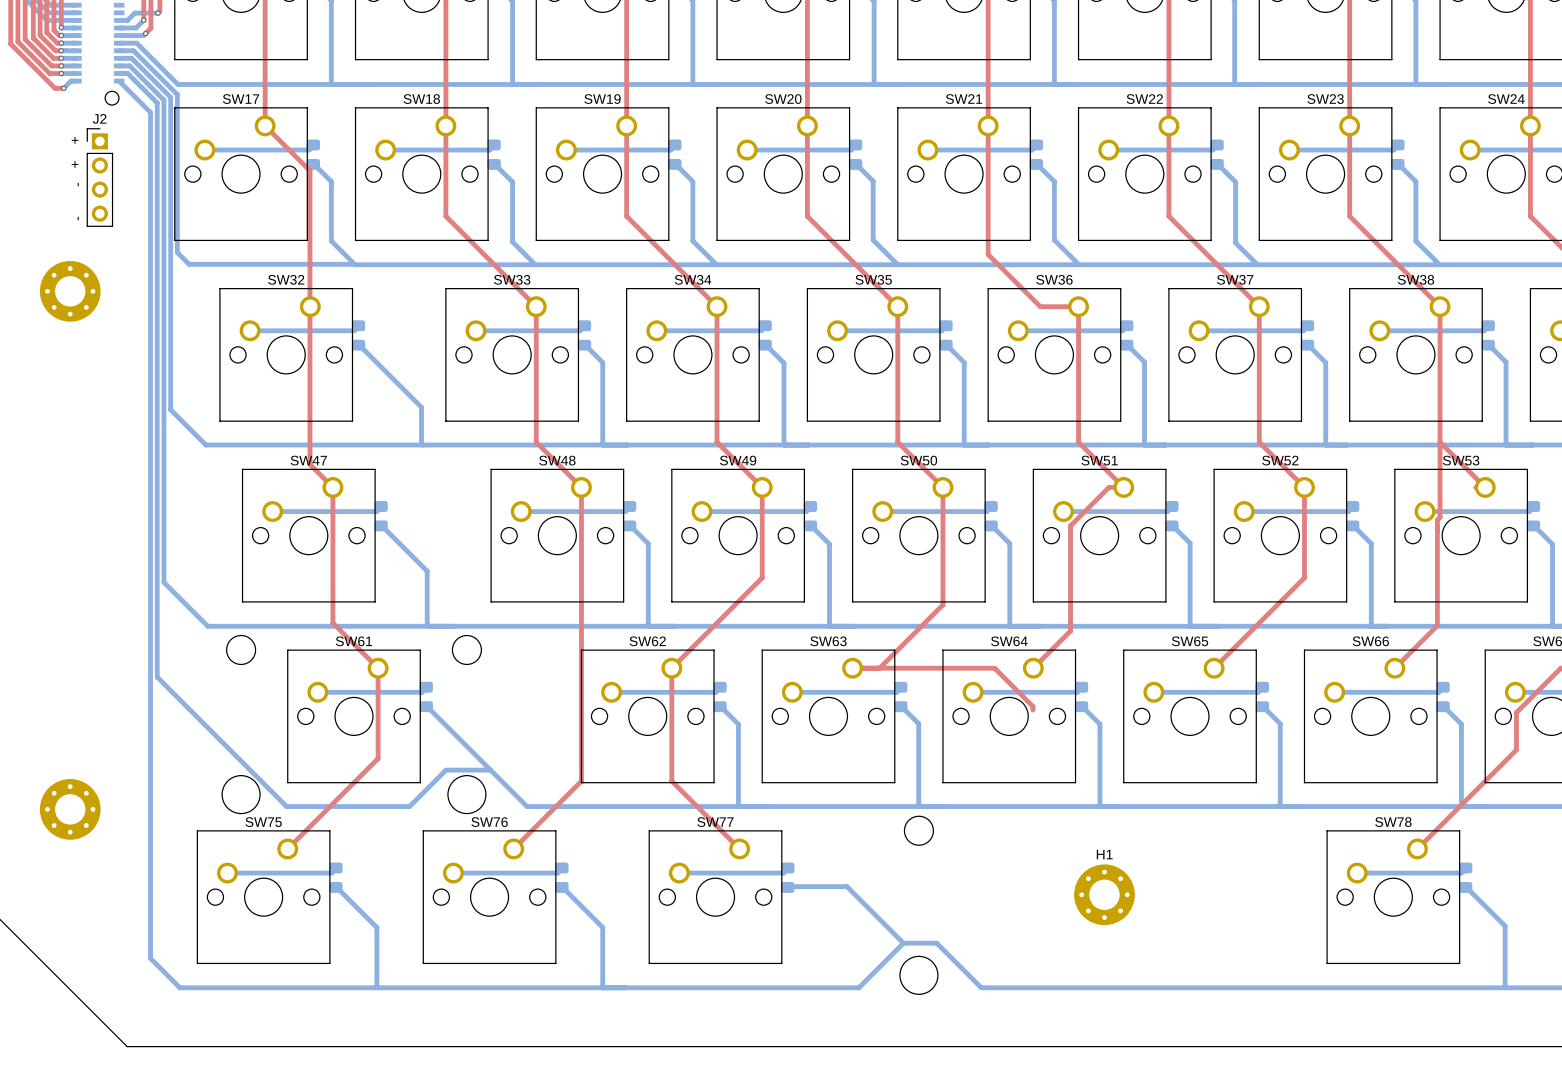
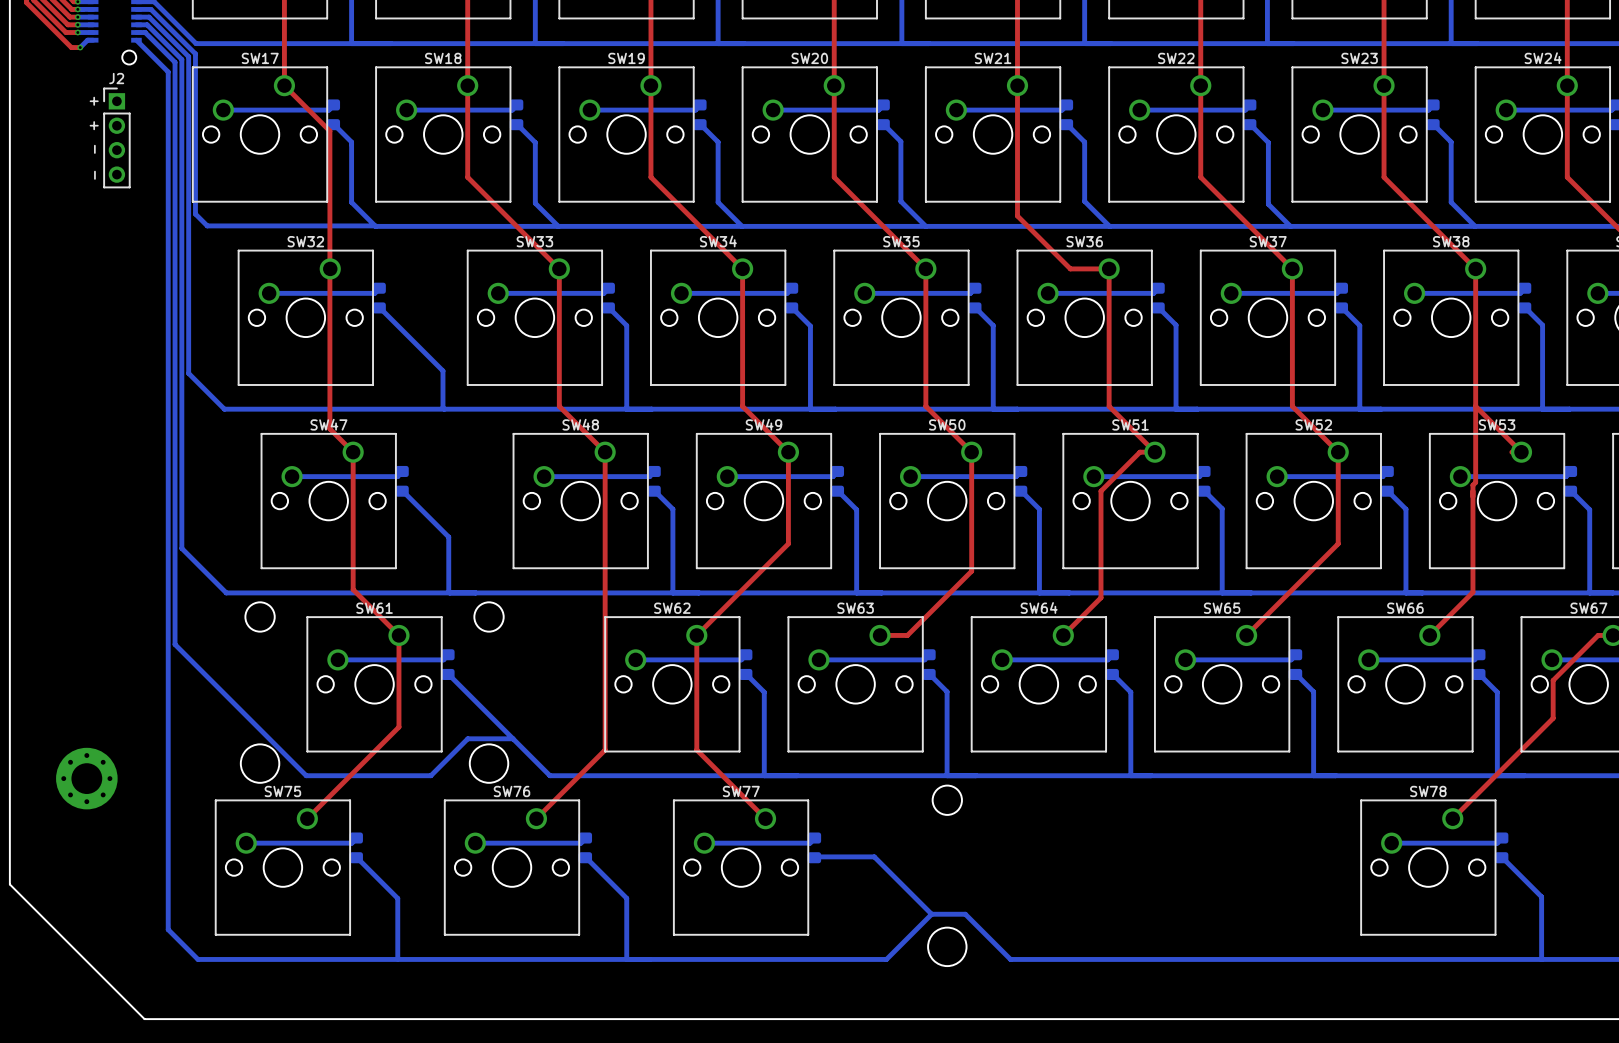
part: (70, 291) -> none
top track: (879, 668) (994, 668) (1033, 706) (1033, 710) -> none
H1: (1104, 894) -> none

